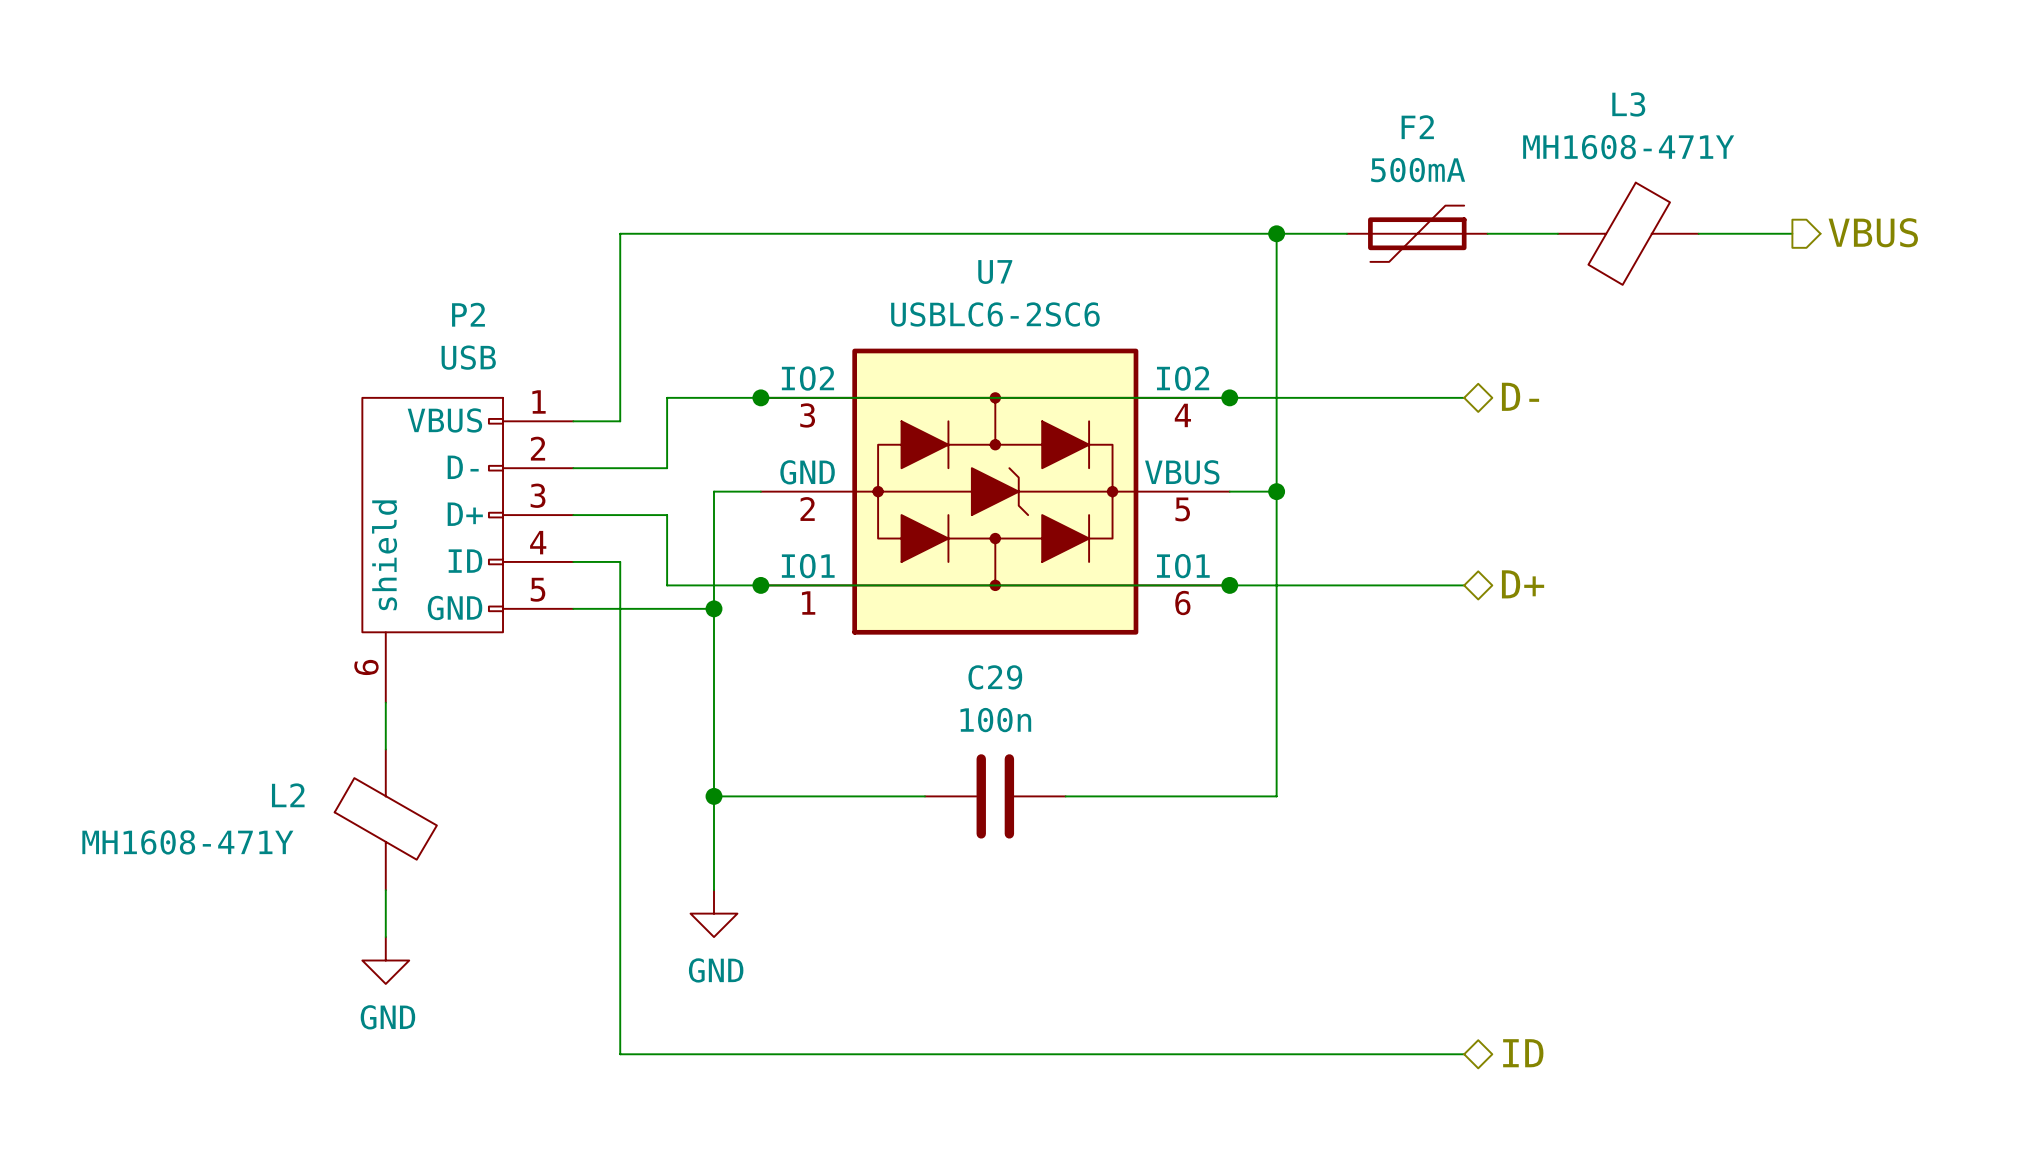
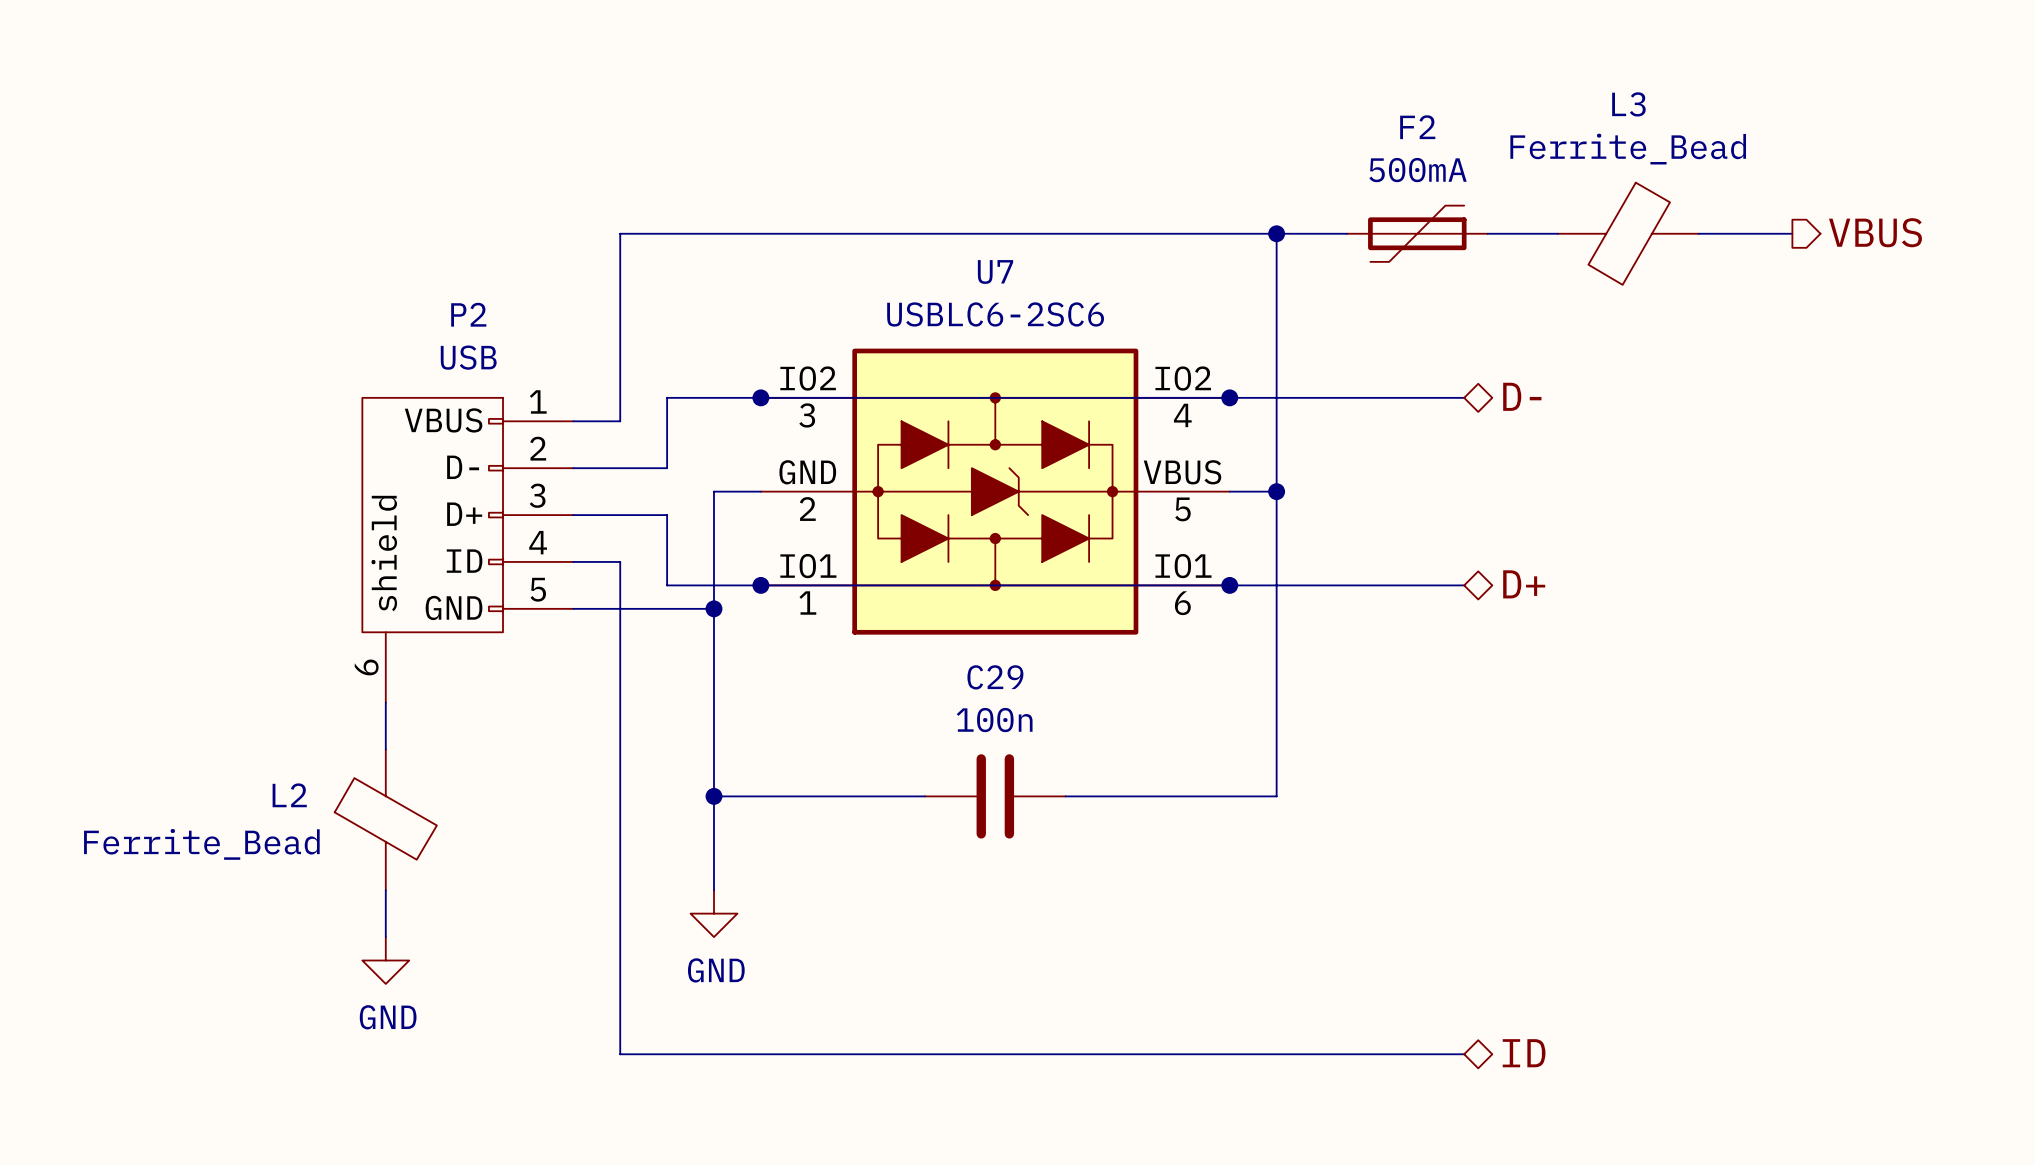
L3 value: MH1608-471Y (1628, 147) -> Ferrite_Bead (1628, 149)
L2 value: MH1608-471Y (187, 842) -> Ferrite_Bead (201, 844)

